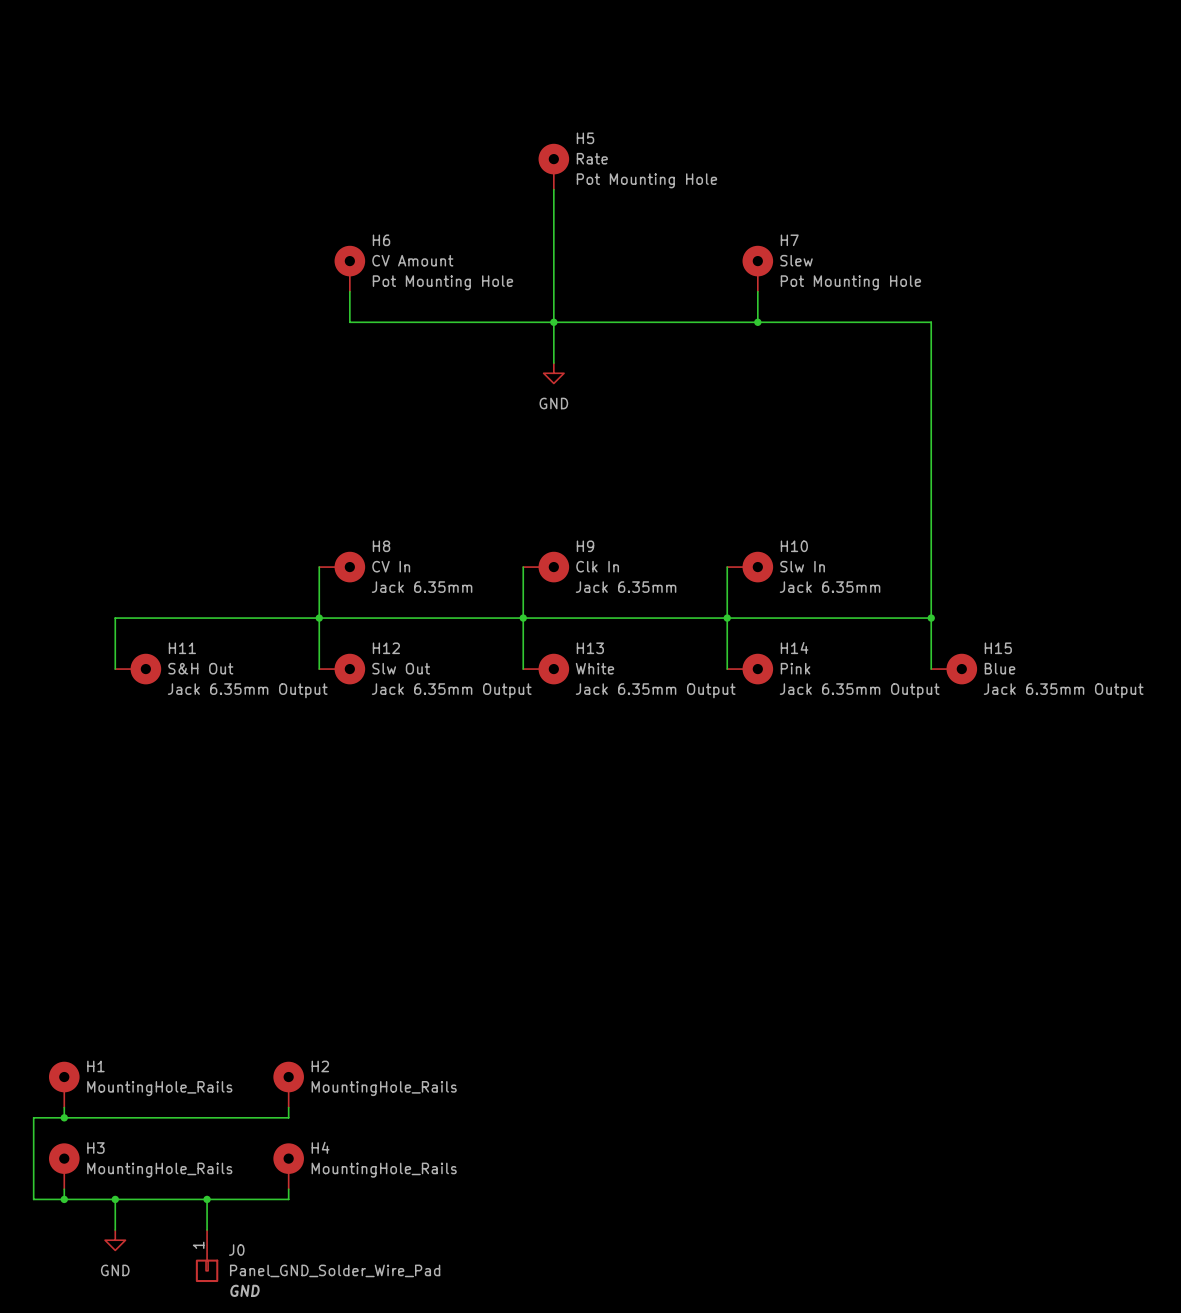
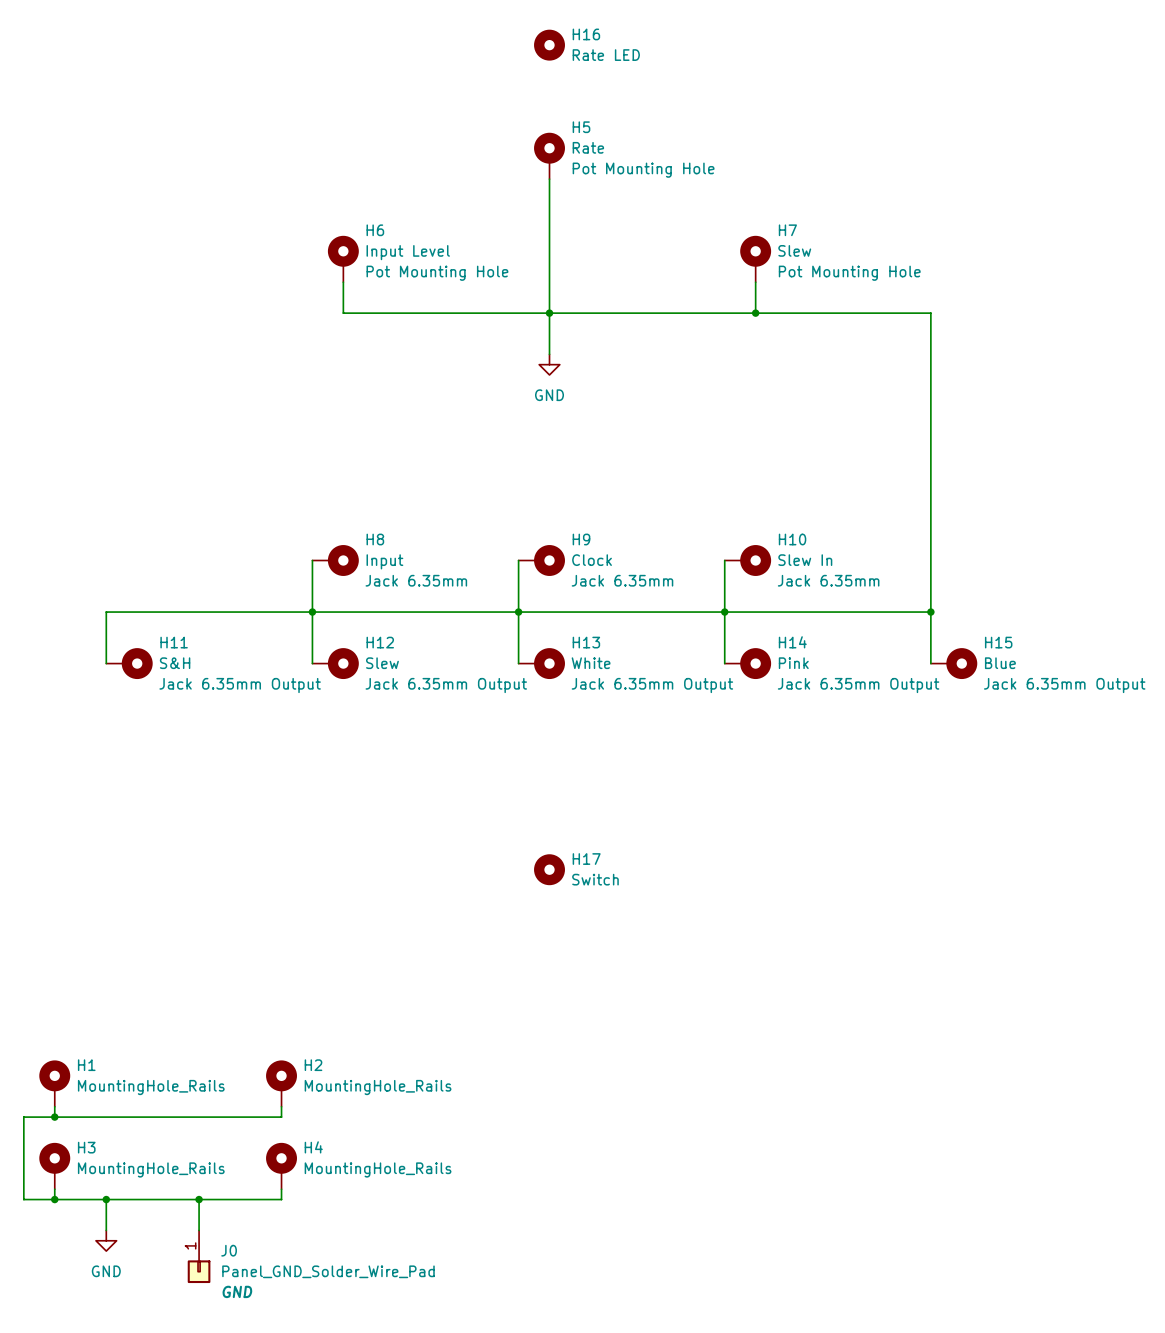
H16: none -> Rate LED (549, 45)
H6 value: CV Amount (412, 260) -> Input Level (408, 252)
H8 value: CV In (391, 566) -> Input (384, 561)
H9 value: Clk In (597, 566) -> Clock (592, 560)
H10 value: Slw In (802, 566) -> Slew In (805, 560)
H11 value: S&H Out (200, 668) -> S&H (175, 663)
H12 value: Slw Out (401, 668) -> Slew (382, 663)
H17: none -> Switch (549, 869)

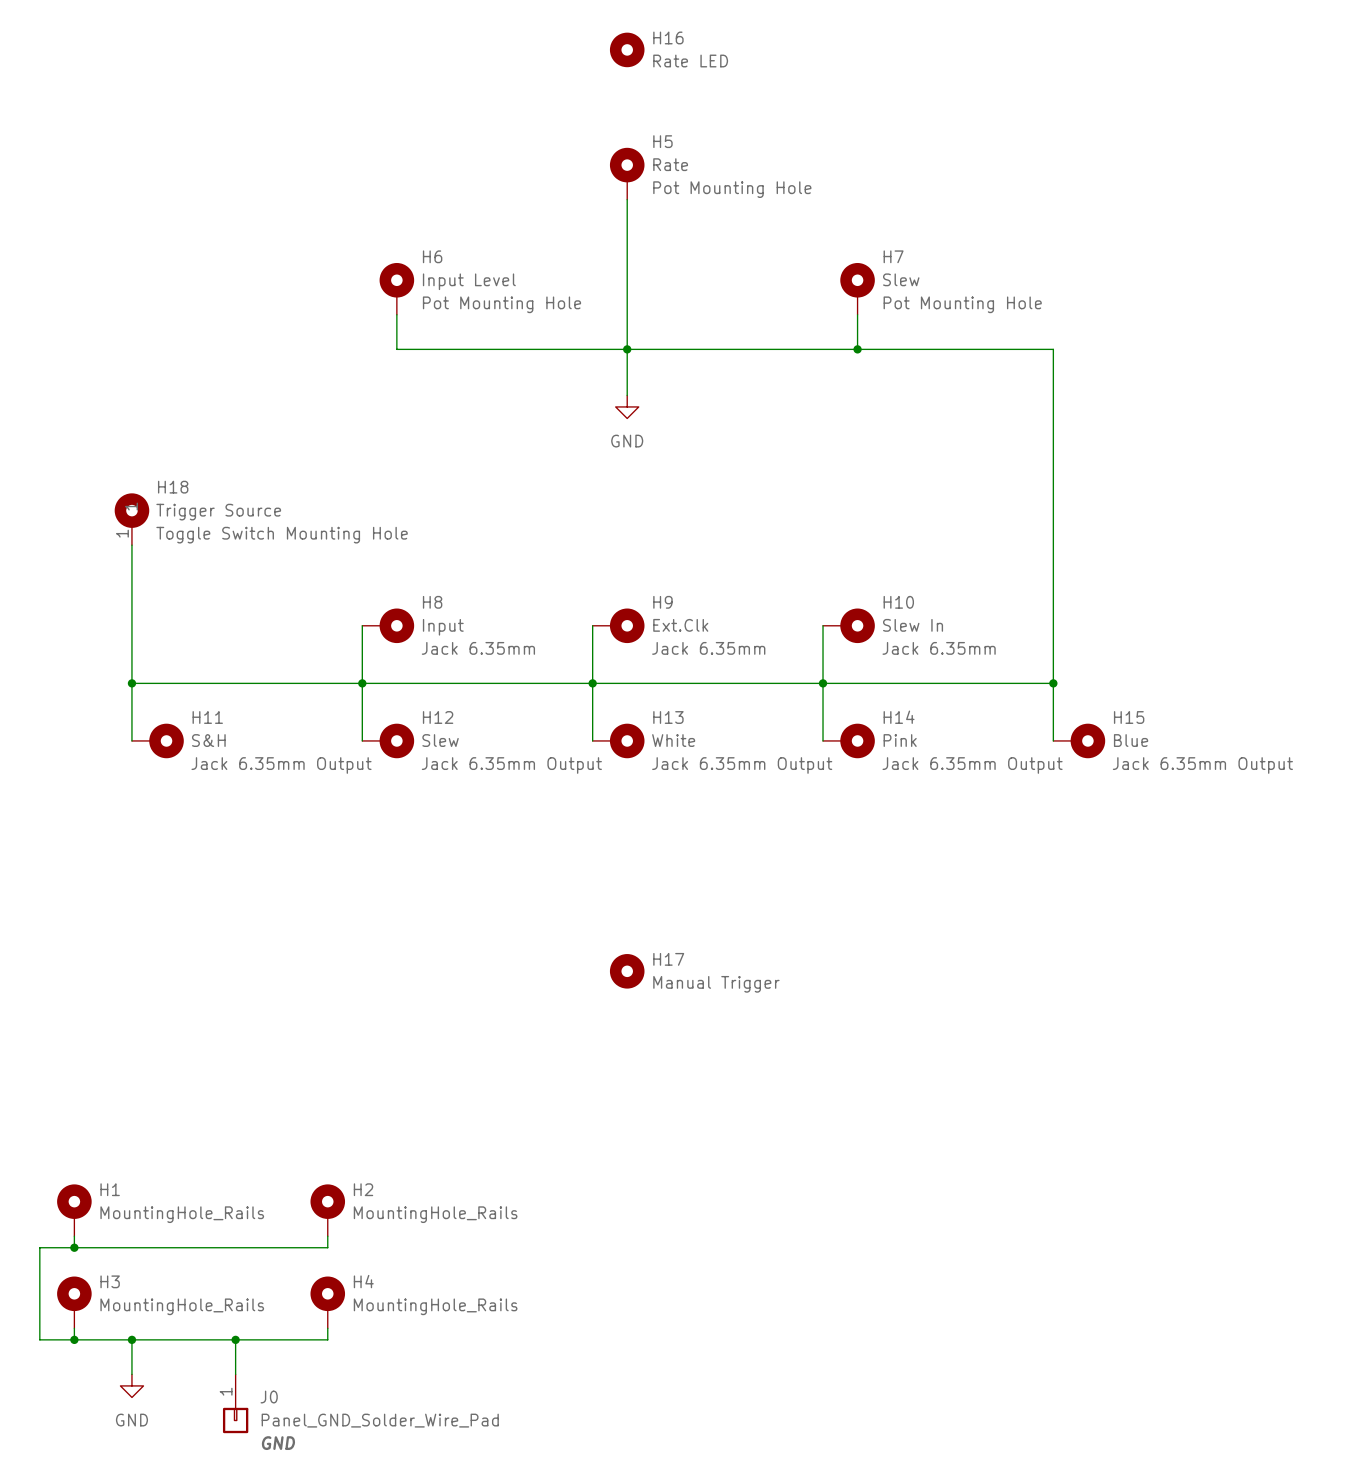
H18: none -> Trigger Source (131, 519)
wire: none -> (131, 545) (131, 683)
H9 value: Clock (592, 560) -> Ext.Clk (680, 625)
junction: none -> (131, 683)
H17 value: Switch (595, 879) -> Manual Trigger (716, 984)

